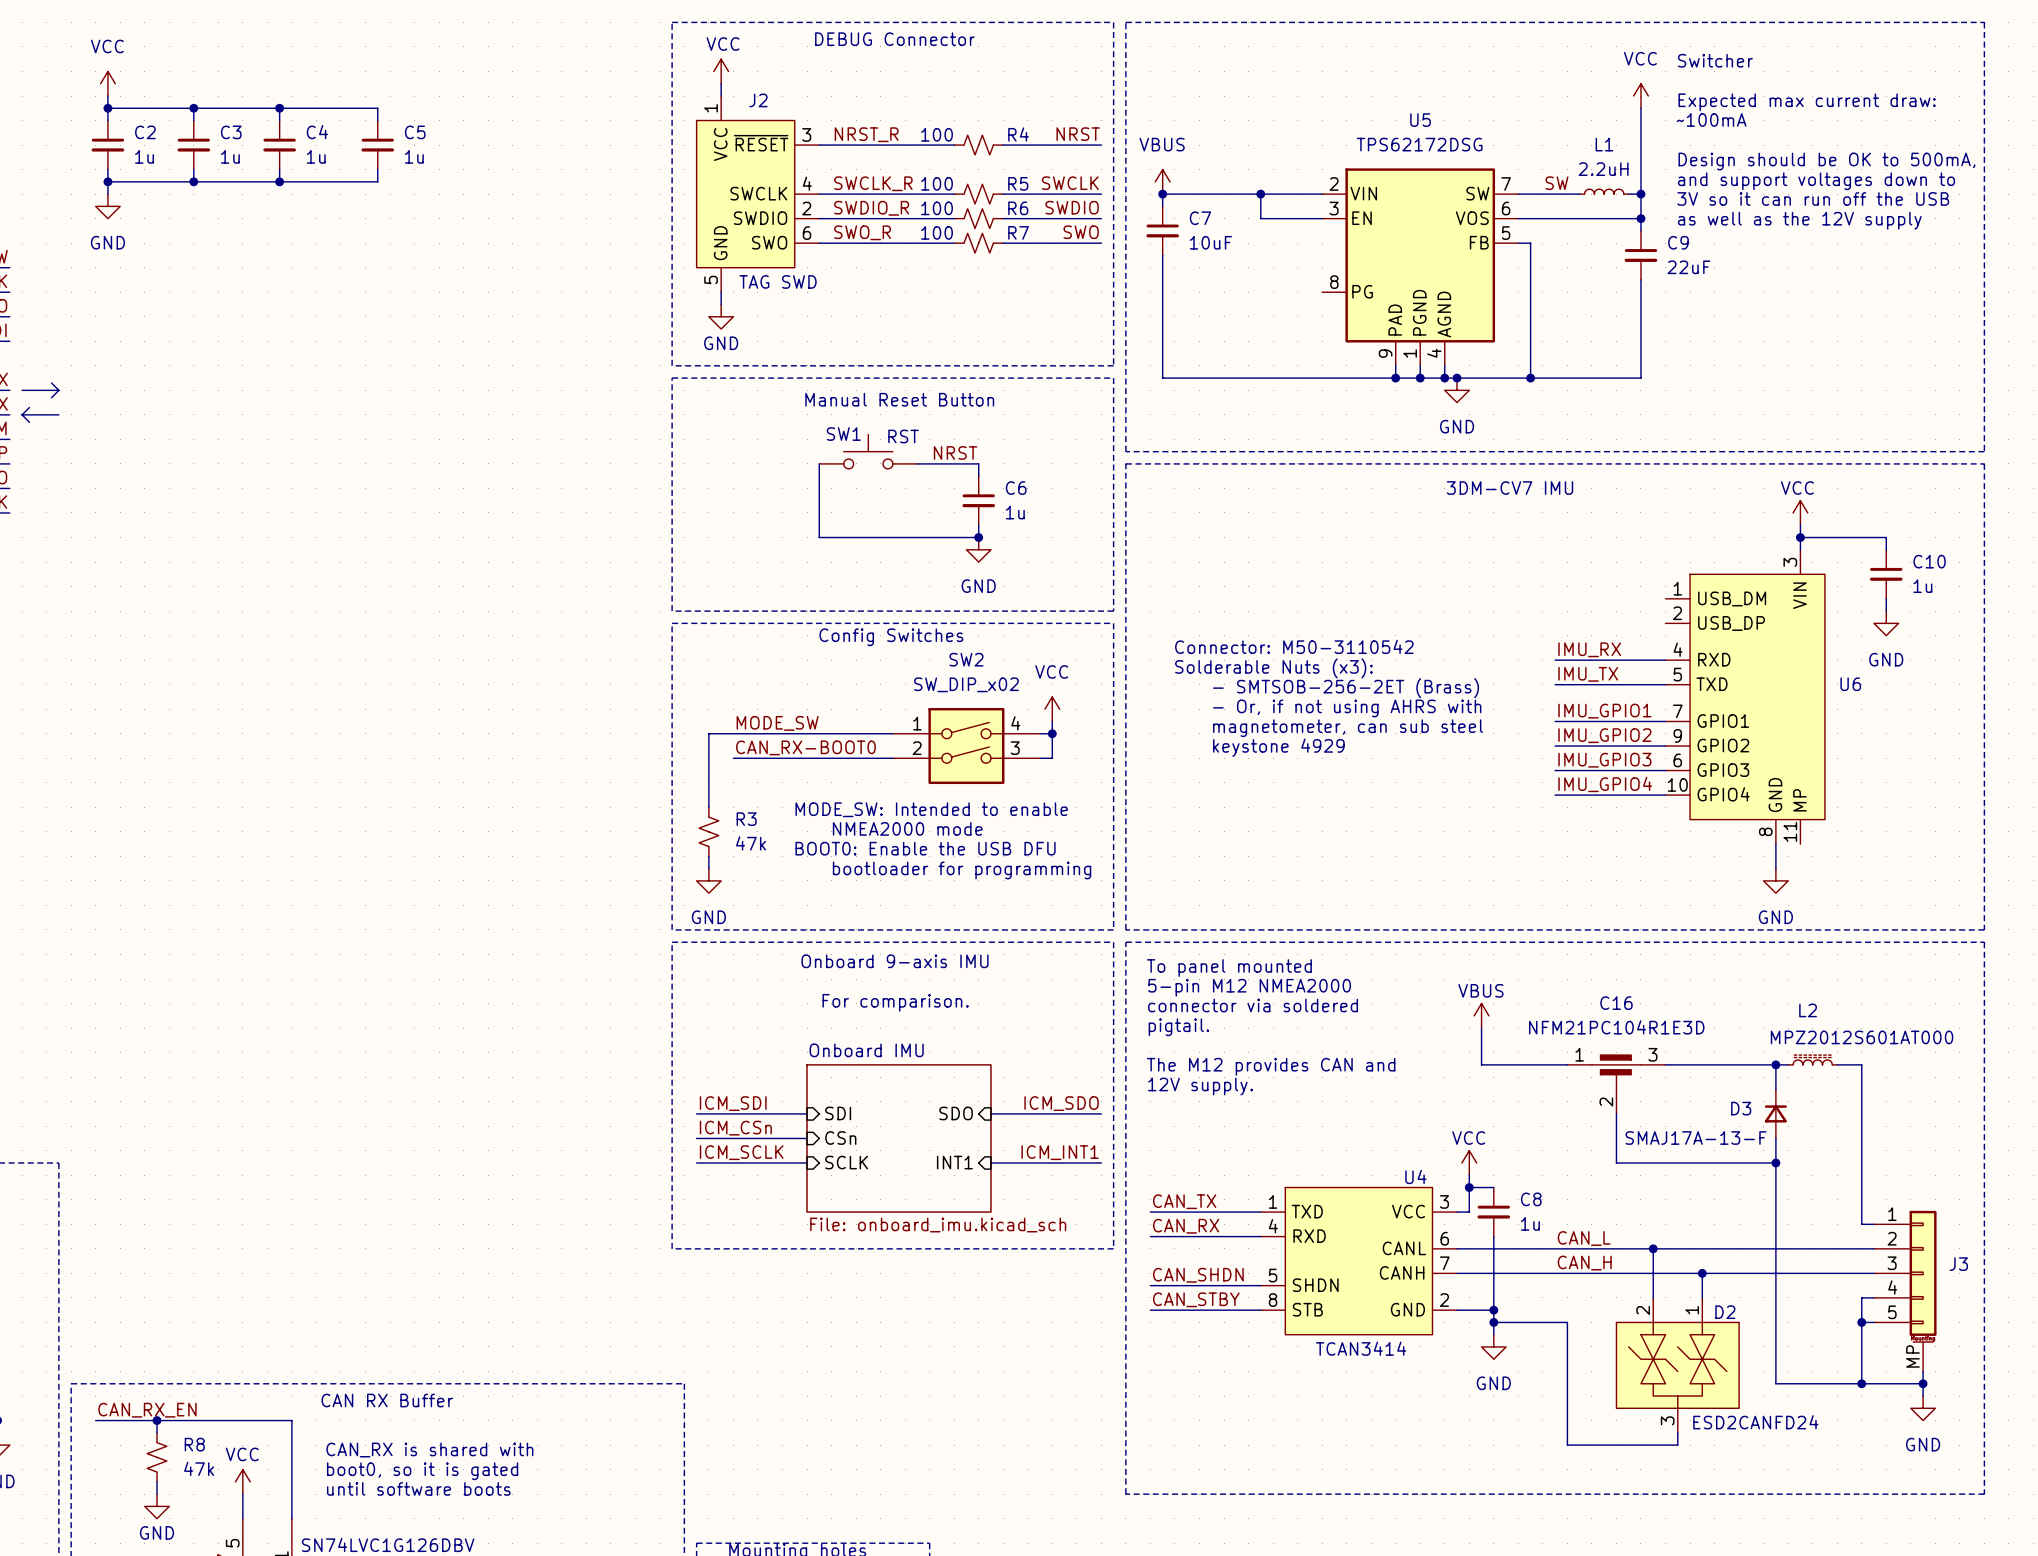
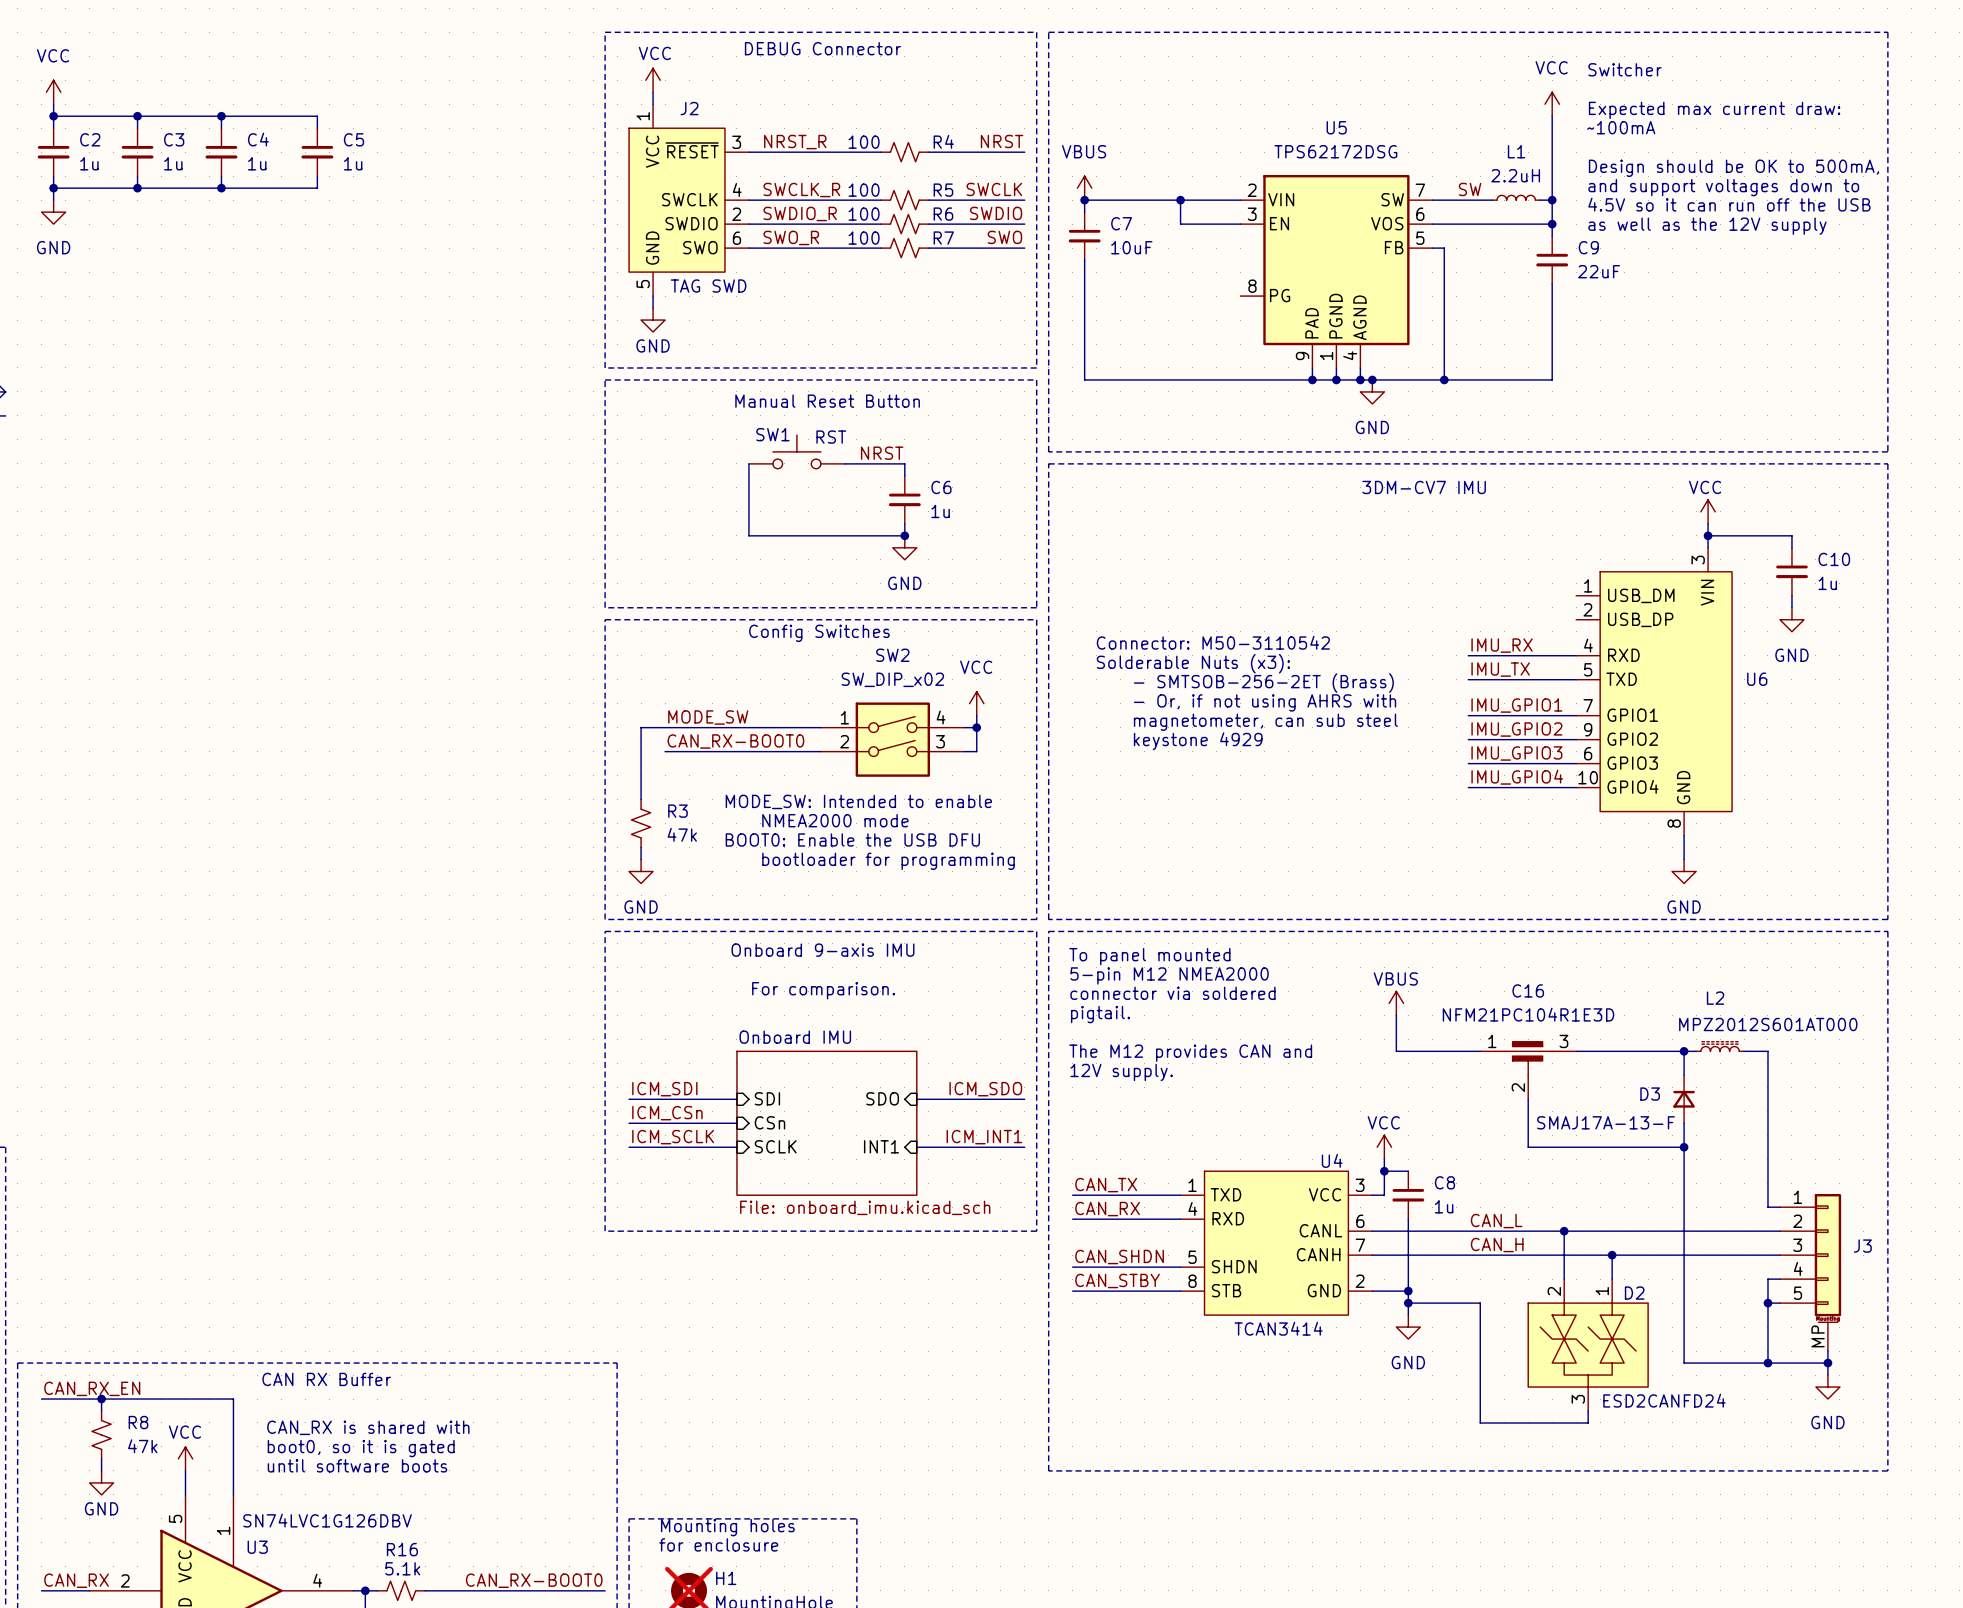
text: 3V so it can run off the USB (1813, 198) -> 4.5V so it can run off the USB (1729, 204)
U6 symbol: [1665, 549, 1825, 845] -> [1576, 547, 1733, 836]

